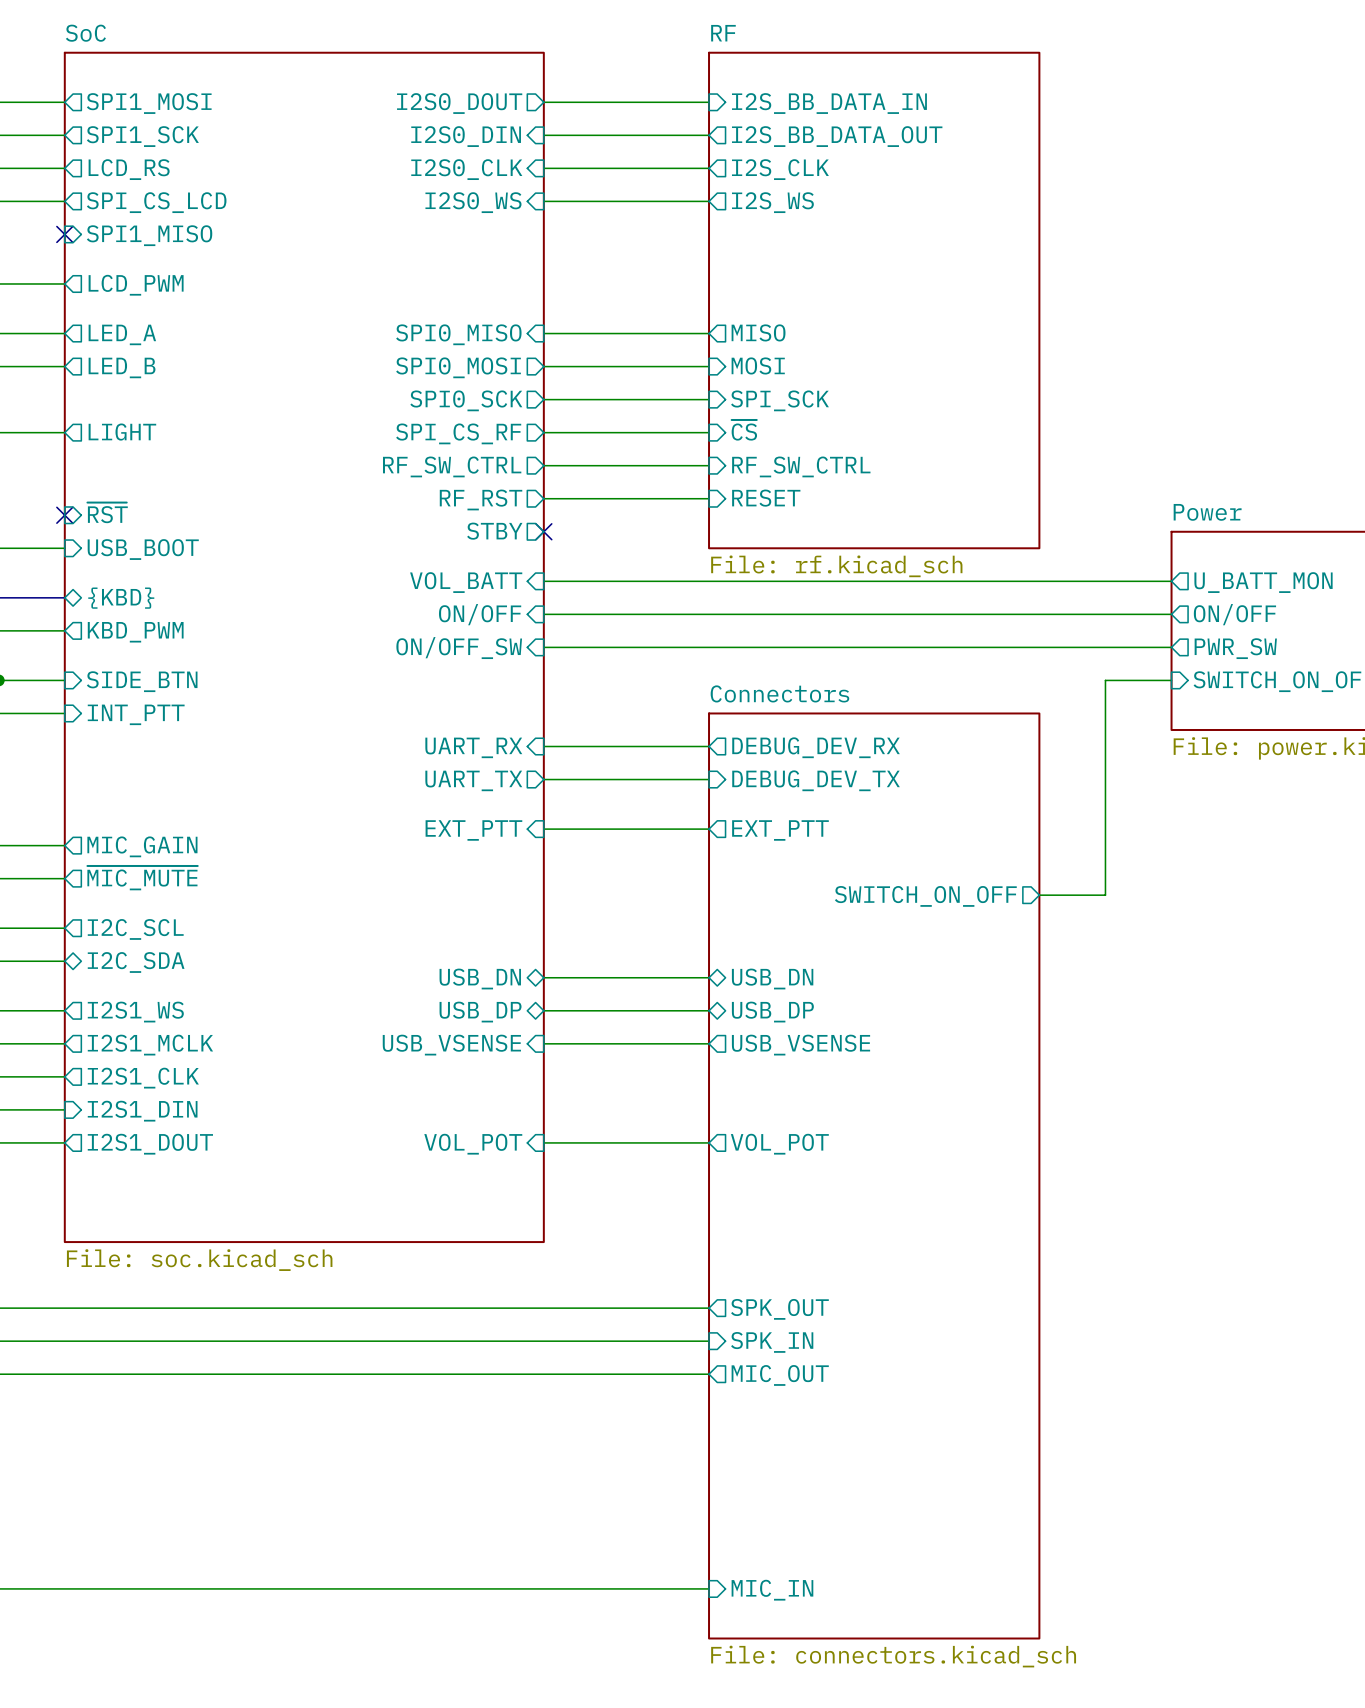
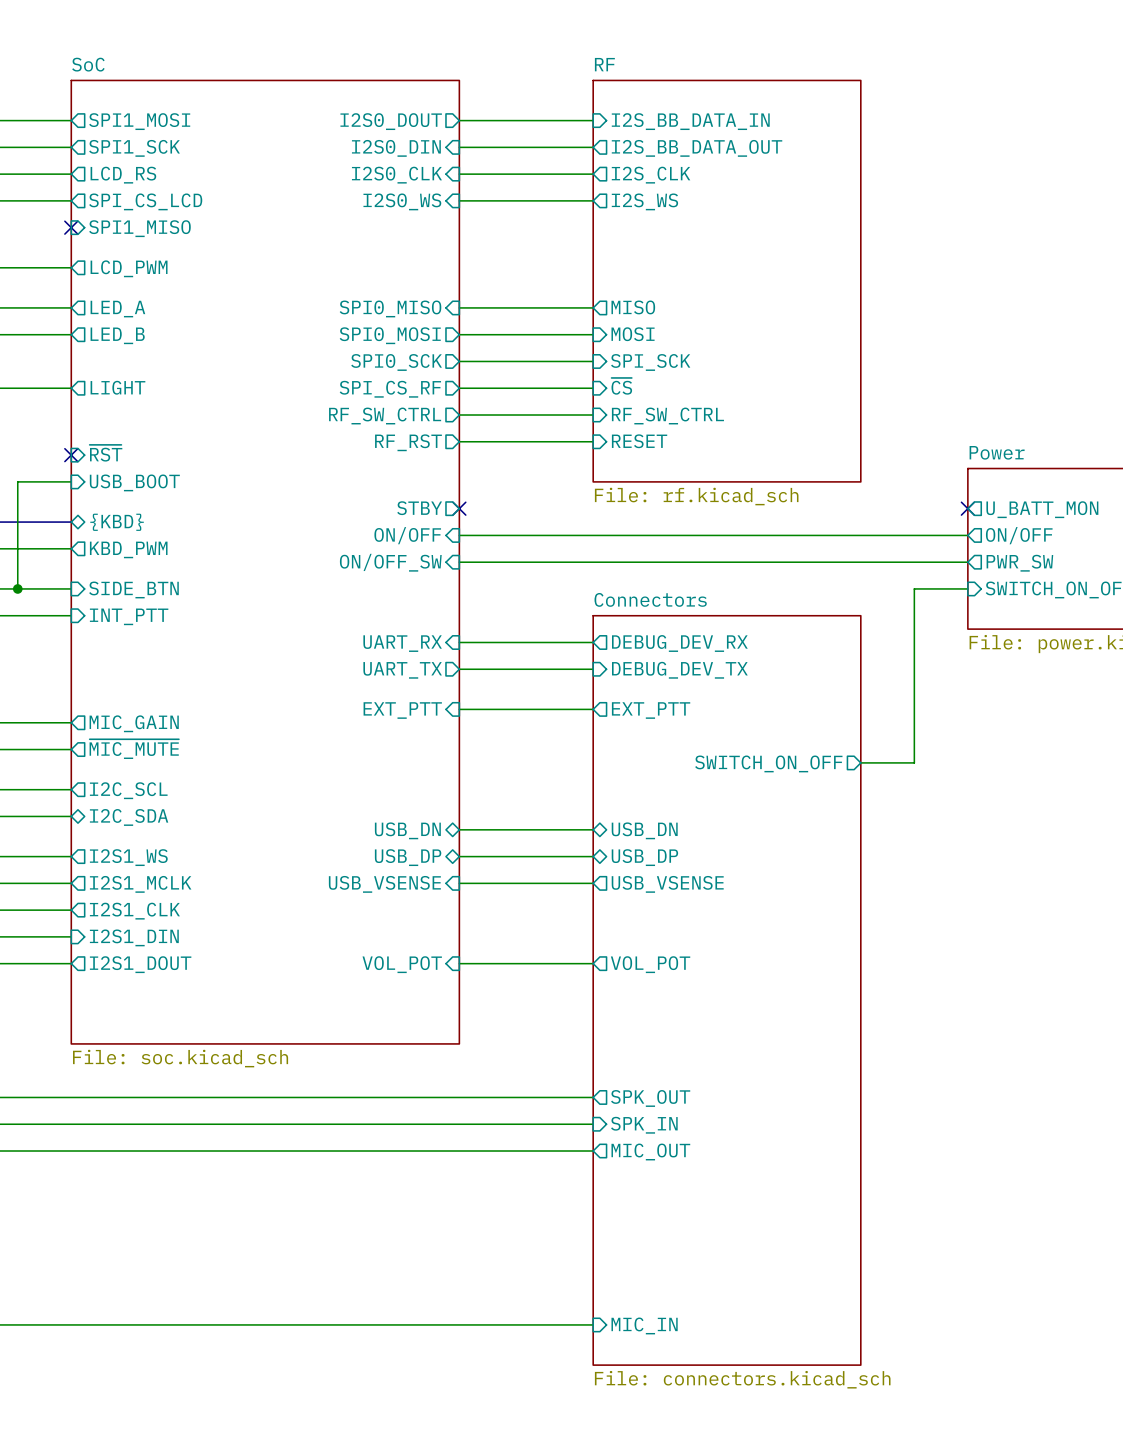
sheet pin: STBY (494, 531) -> none
no-connect mark position: (543, 531) -> (459, 508)
wire: (543, 581) (1171, 581) -> none
no-connect mark: none -> (967, 508)
sheet pin shape: input (466, 582) -> output (419, 508)
sheet pin: VOL_BATT (466, 582) -> STBY (419, 508)

